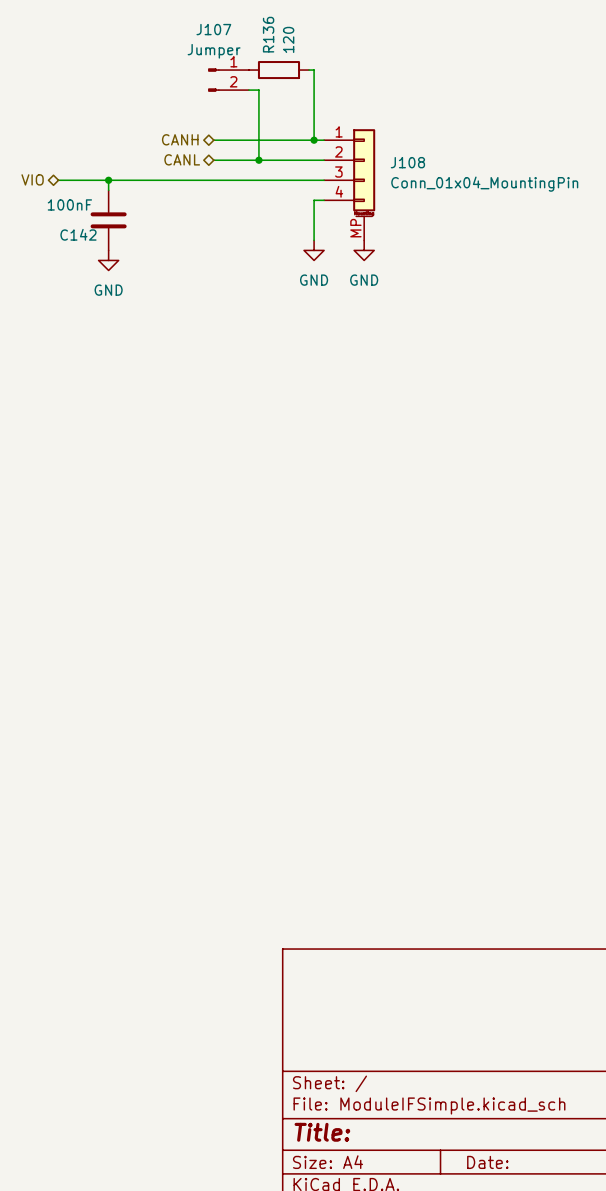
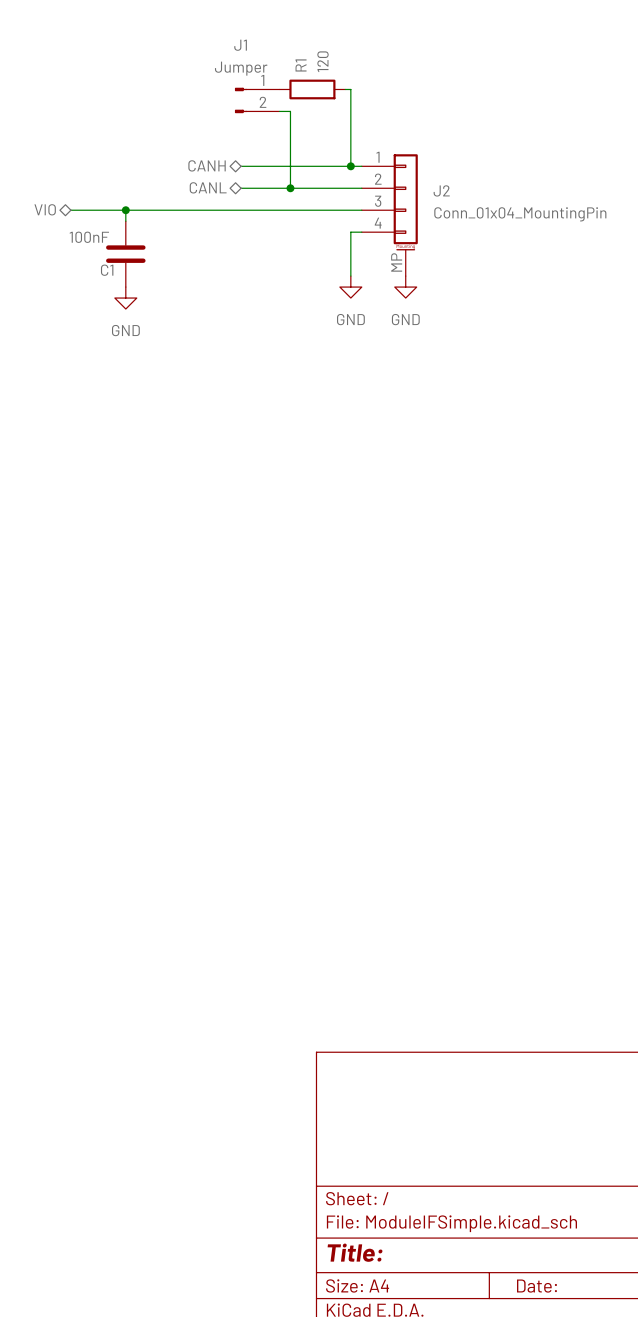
J107 name: J107 (213, 29) -> J1 (240, 45)
R136 name: R136 (268, 34) -> R1 (301, 65)
J108 name: J108 (407, 162) -> J2 (441, 190)
C142 name: C142 (78, 234) -> C1 (107, 270)

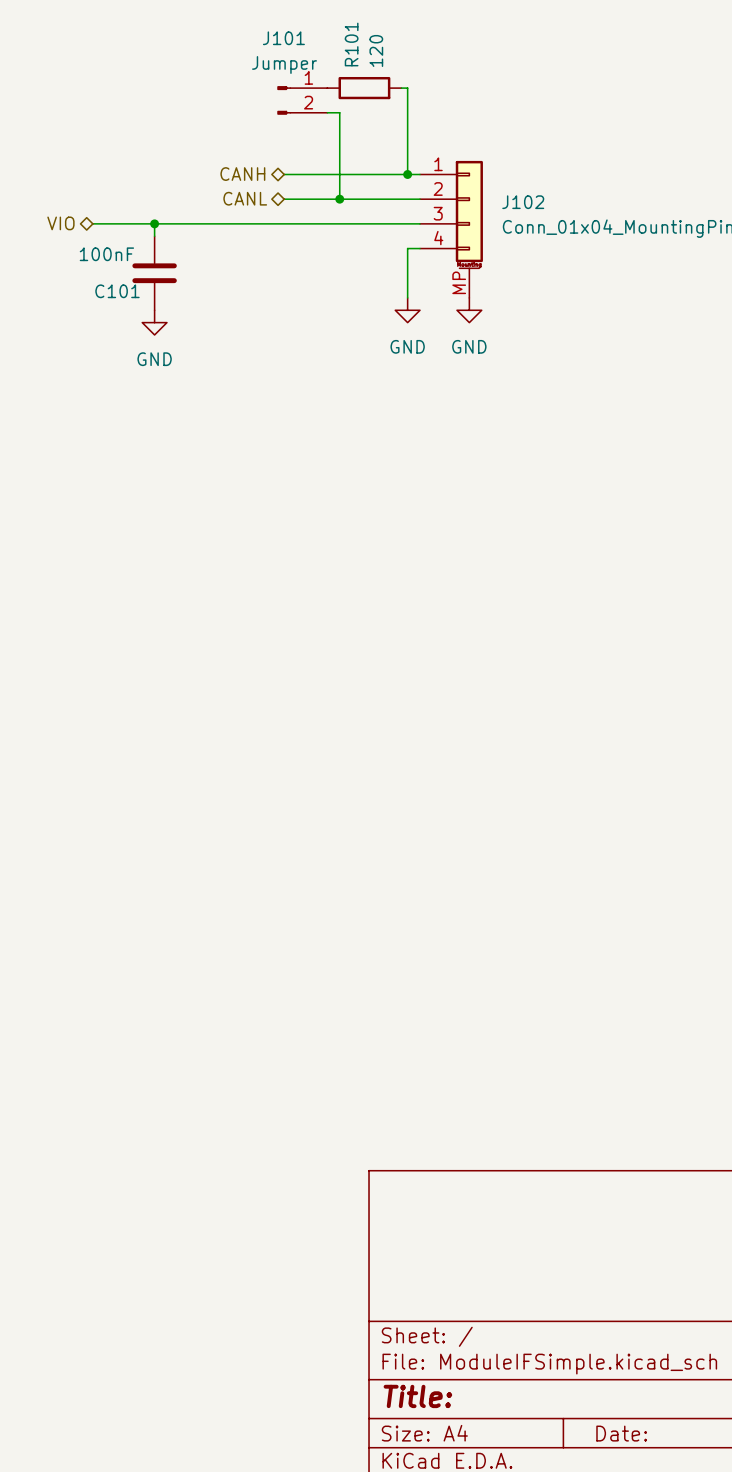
J1 name: J1 (240, 45) -> J101 (283, 38)
R1 name: R1 (301, 65) -> R101 (351, 44)
J2 name: J2 (441, 190) -> J102 (523, 202)
C1 name: C1 (107, 270) -> C101 (117, 291)

